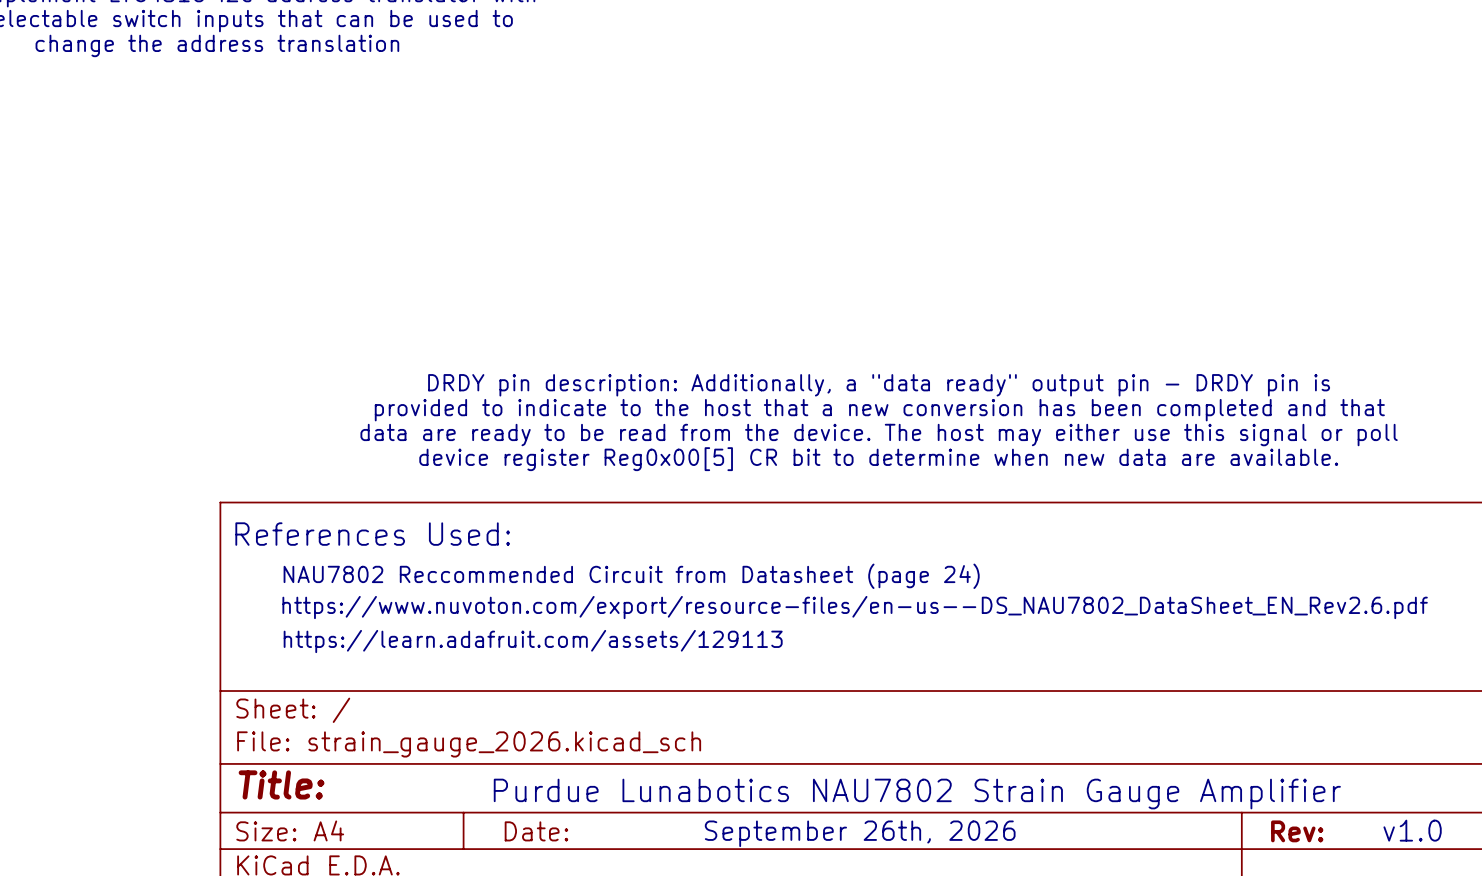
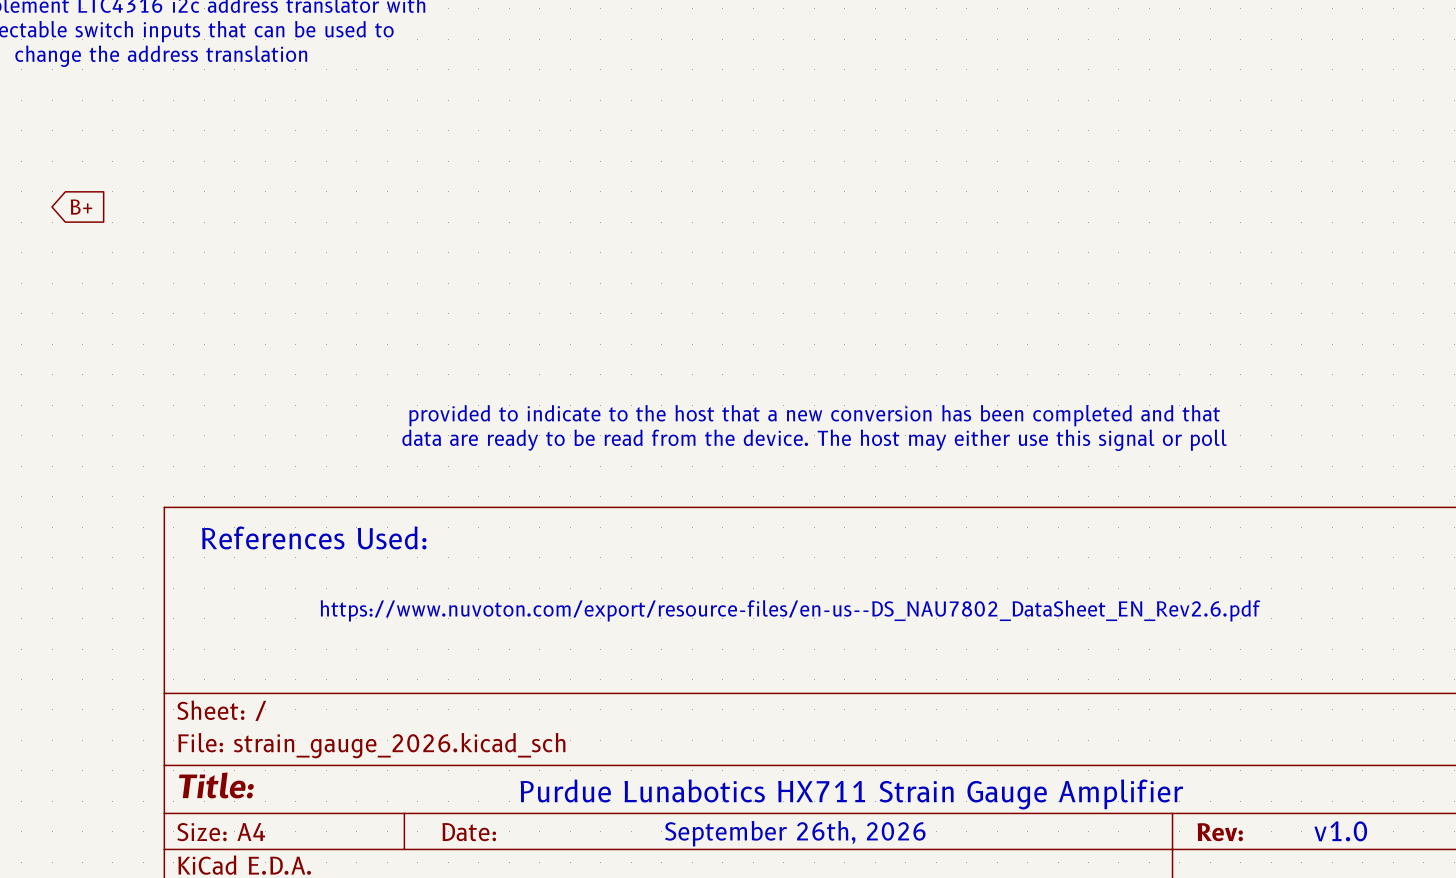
global label: none -> B+ (81, 207)
text: DRDY pin description: Additionally, a "data ready" output pin - DRDY pin is (879, 385) -> none
text: device register Reg0x00[5] CR bit to determine when new data are available. (878, 459) -> none
text: NAU7802 Reccommended Circuit from Datasheet (page 24) (631, 576) -> none
text: https://learn.adafruit.com/assets/129113 (533, 641) -> none
text: Purdue Lunabotics NAU7802 Strain Gauge Amplifier (917, 794) -> Purdue Lunabotics HX711 Strain Gauge Amplifier (851, 794)

